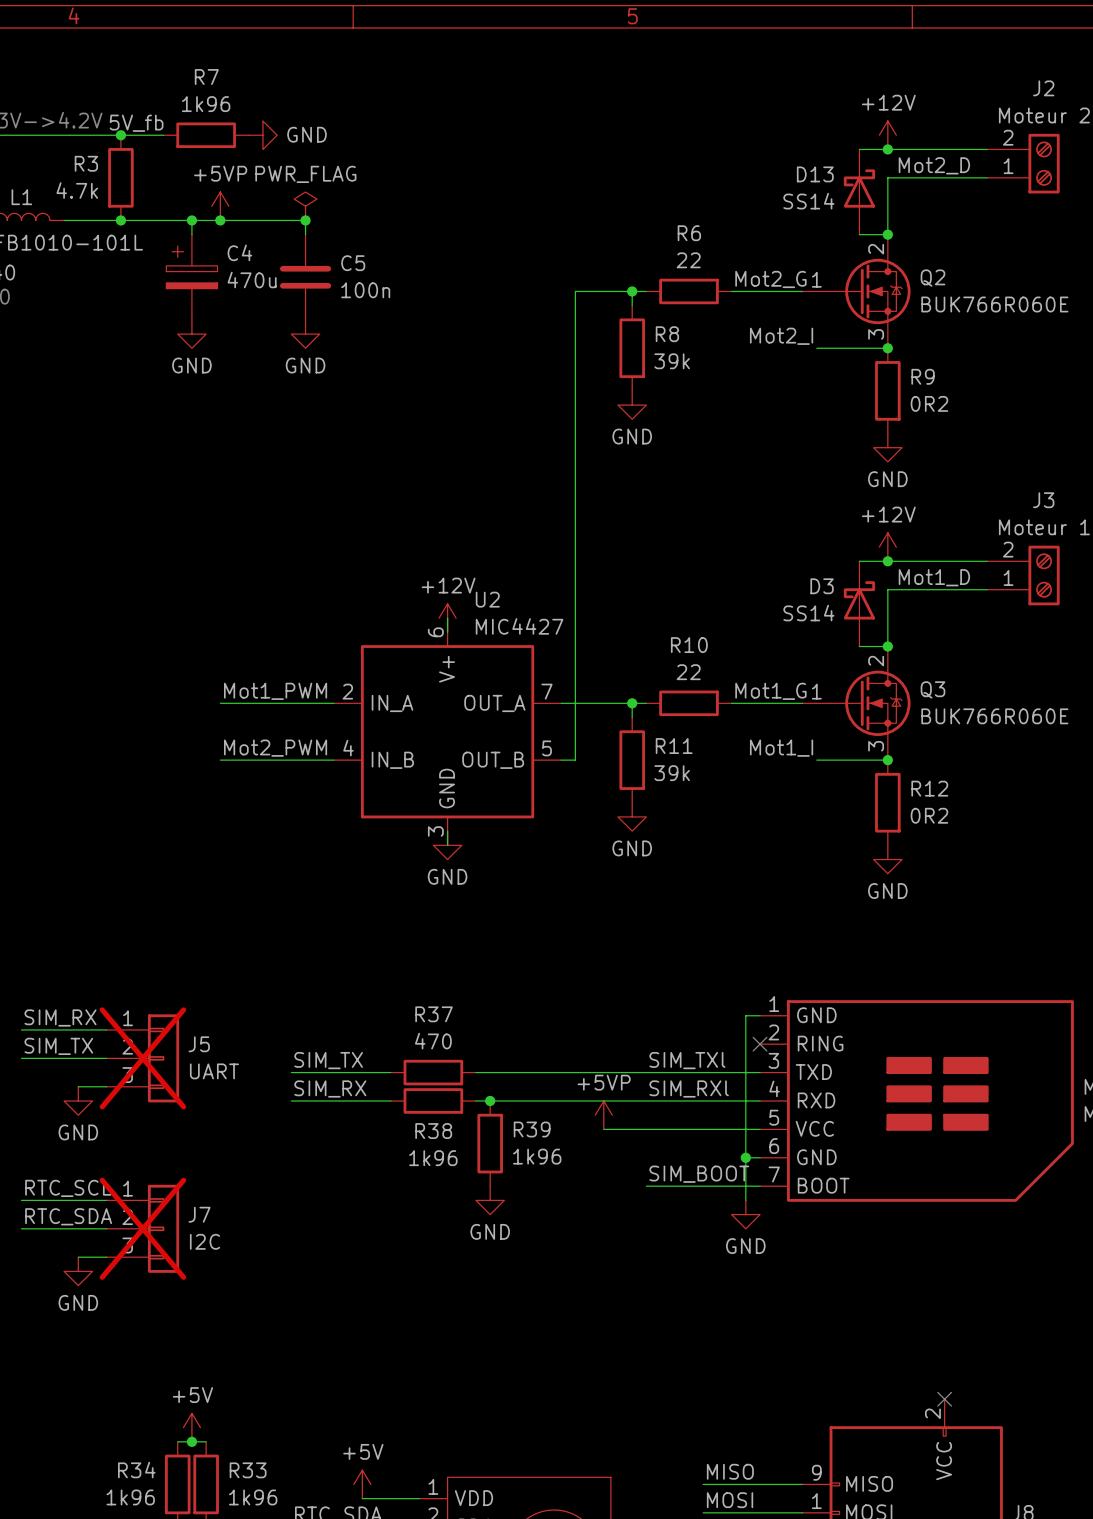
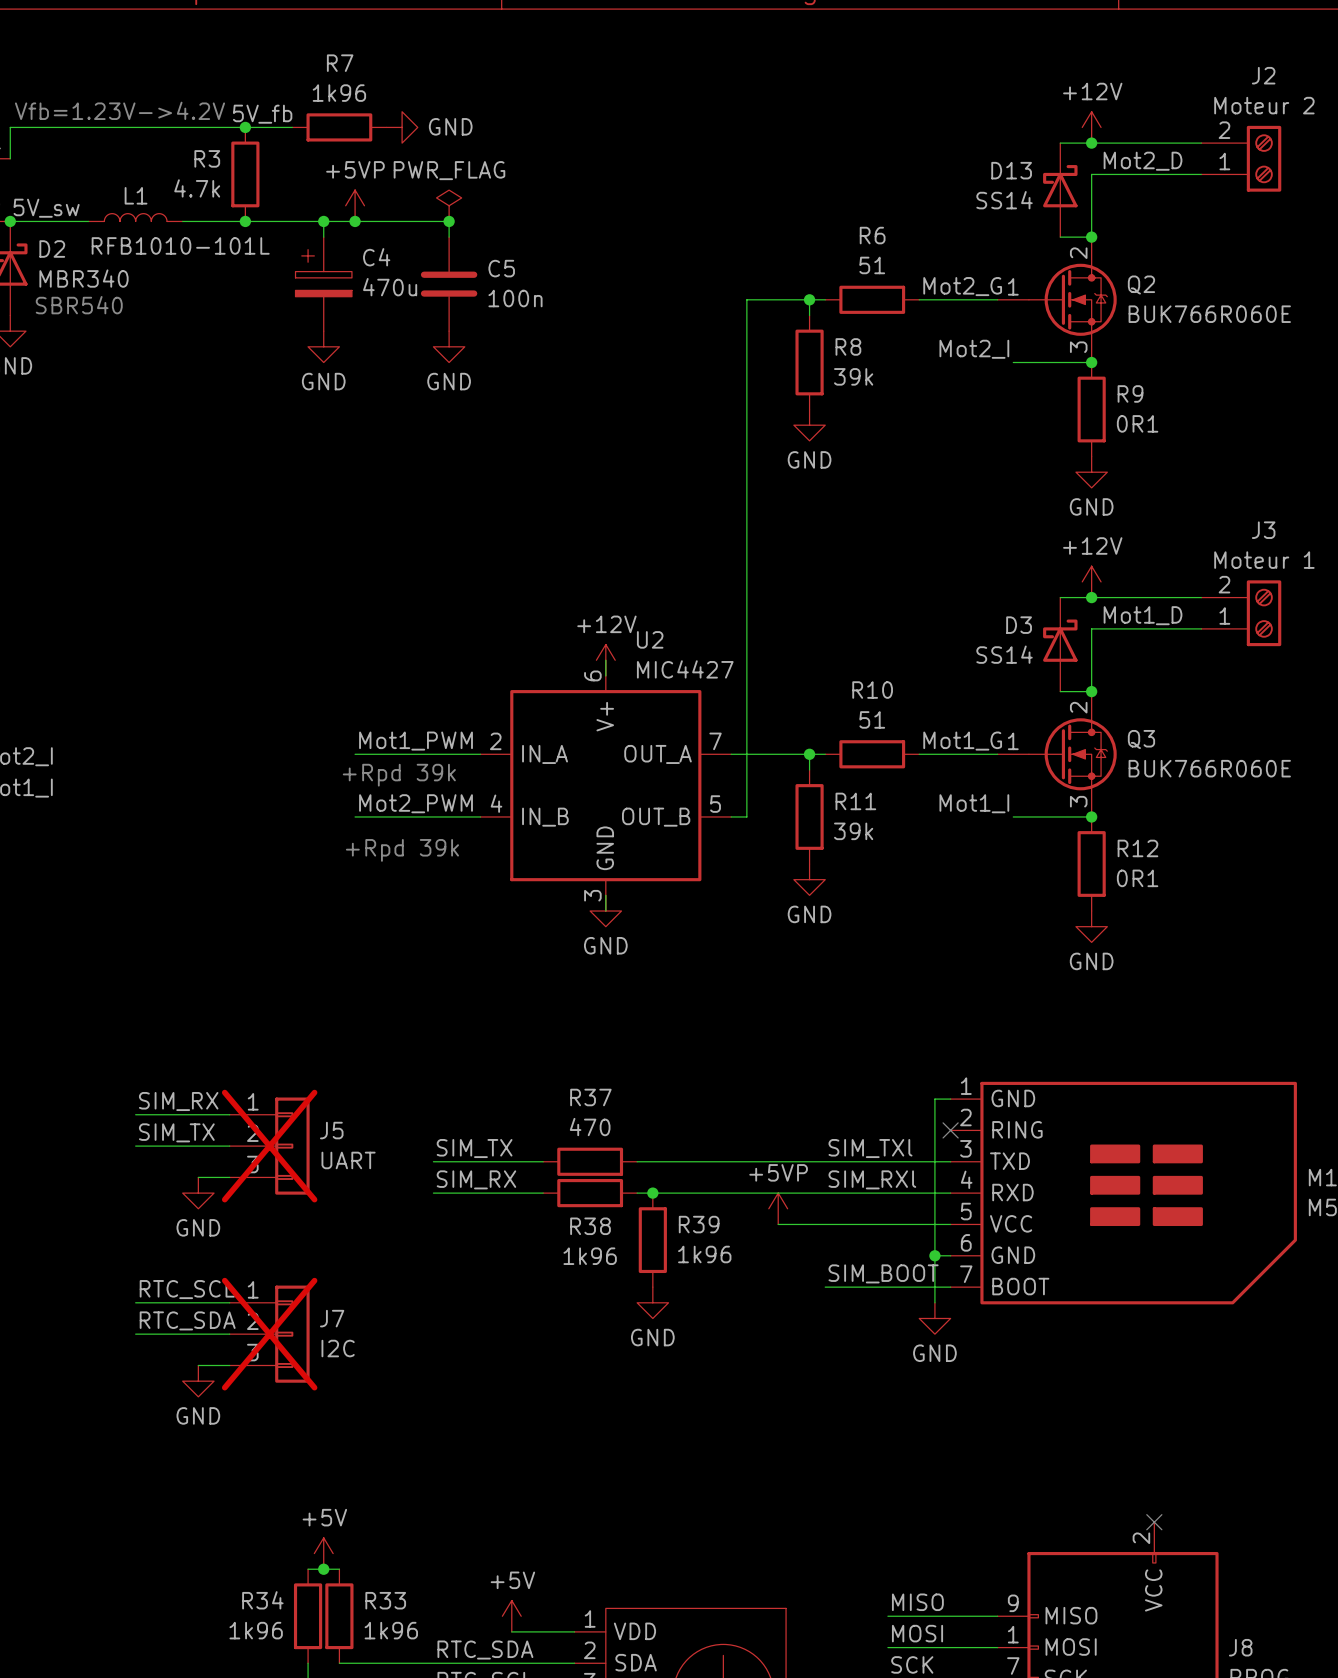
R6 value: 22 (688, 260) -> 51 (872, 265)
R9 value: 0R2 (929, 403) -> 0R1 (1137, 423)
R10 value: 22 (688, 672) -> 51 (872, 719)
text: none -> +Rpd 39k (399, 775)
text: none -> +Rpd 39k (402, 850)
R12 value: 0R2 (929, 815) -> 0R1 (1137, 878)

